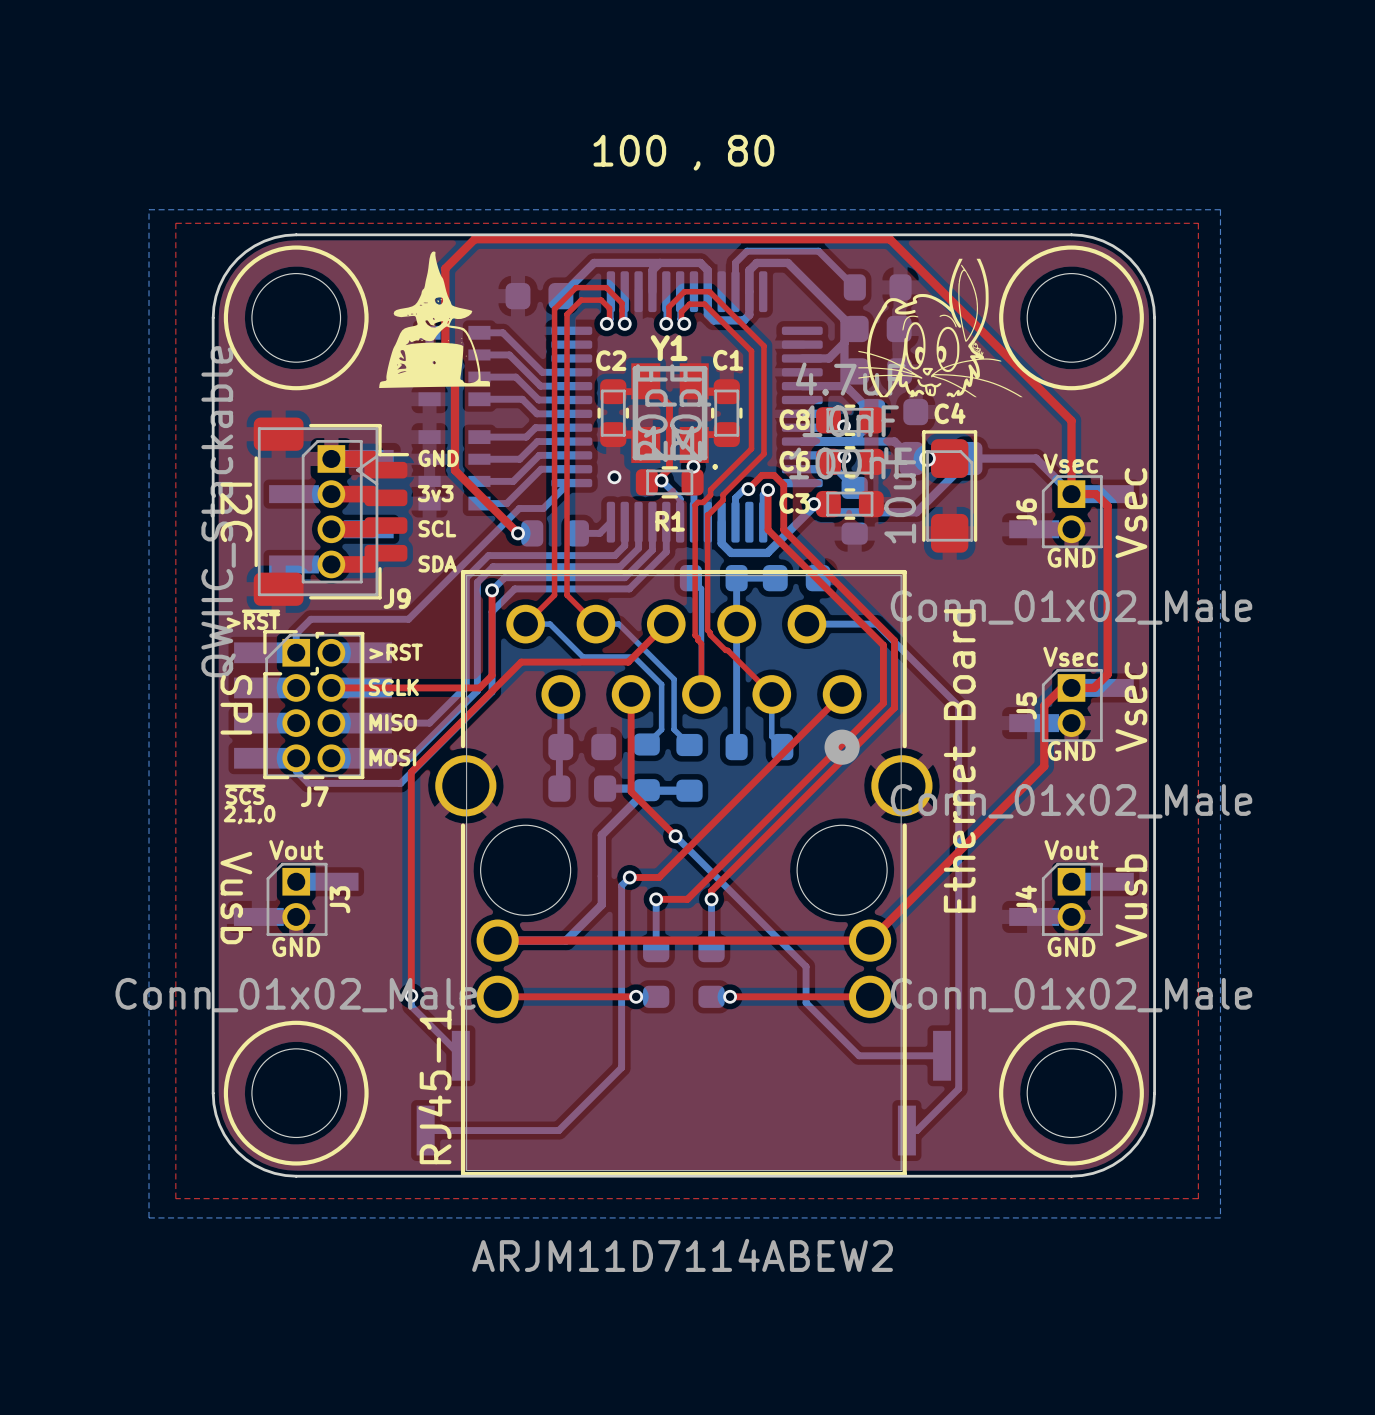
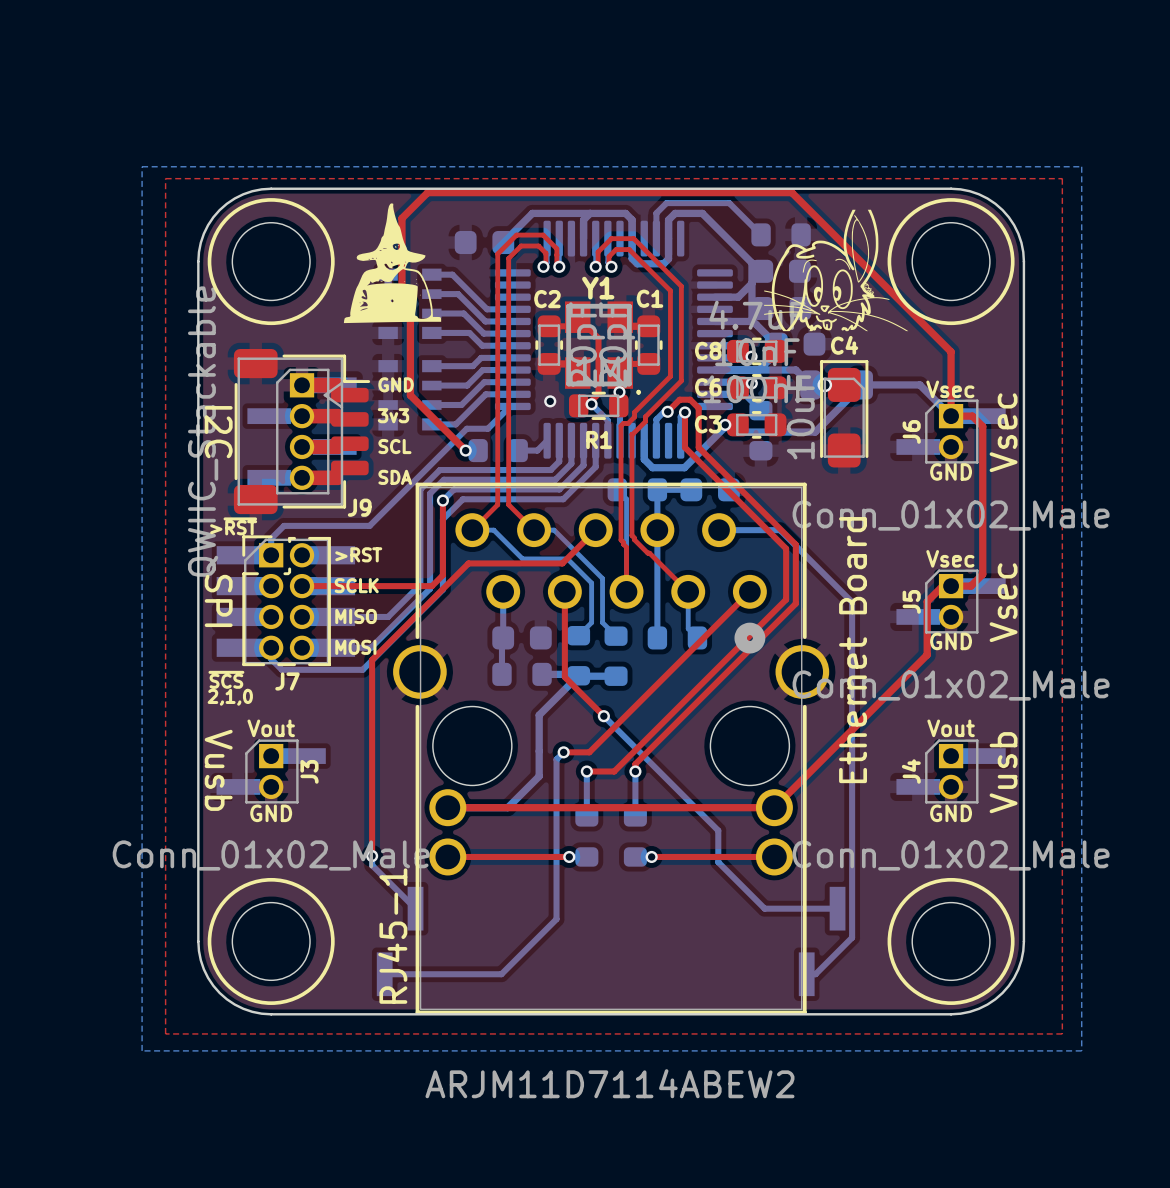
text: 100 , 80 (683, 152) -> none

